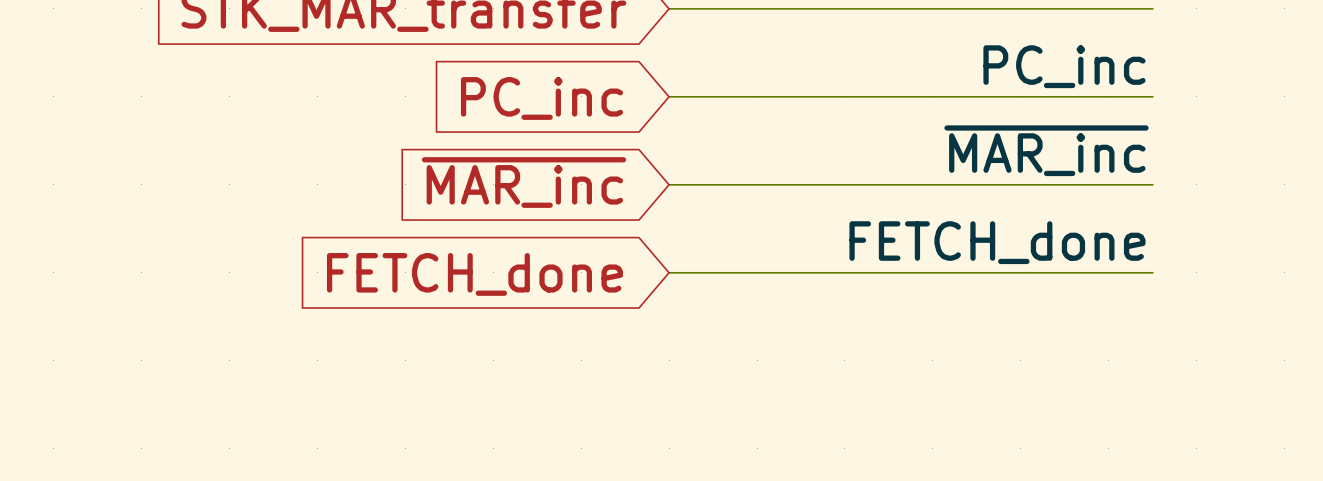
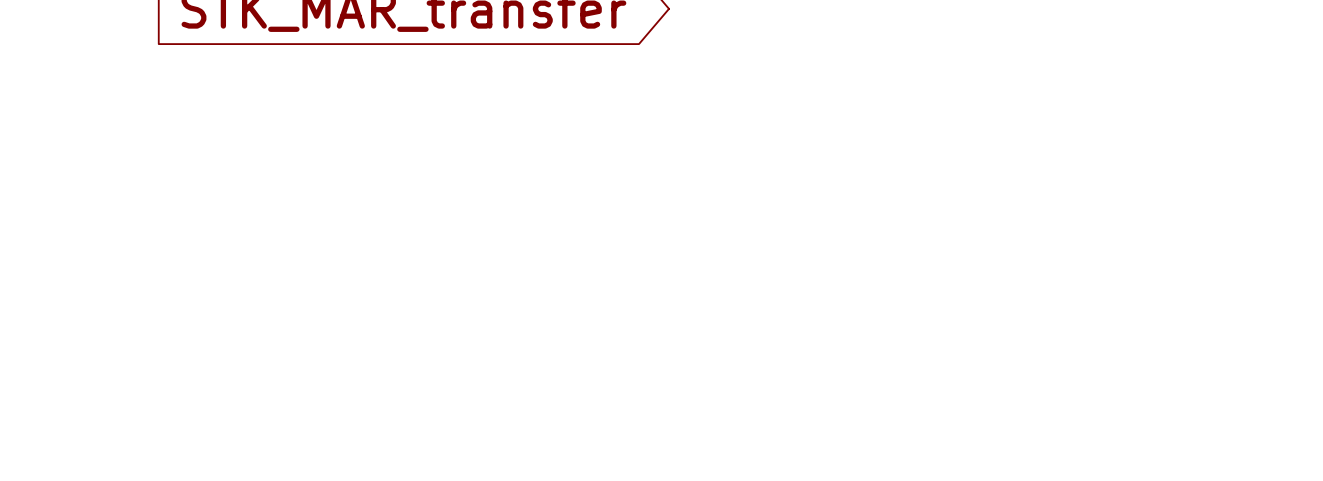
wire: (669, 8) (1152, 8) -> none
label: PC_inc (1064, 66) -> none
wire: (669, 96) (1152, 96) -> none
global label: PC_inc (541, 98) -> none
label: ~{MAR_inc} (1046, 150) -> none
global label: ~{MAR_inc} (524, 182) -> none
wire: (669, 184) (1152, 184) -> none
label: FETCH_done (997, 242) -> none
wire: (669, 272) (1152, 272) -> none
global label: FETCH_done (475, 274) -> none

